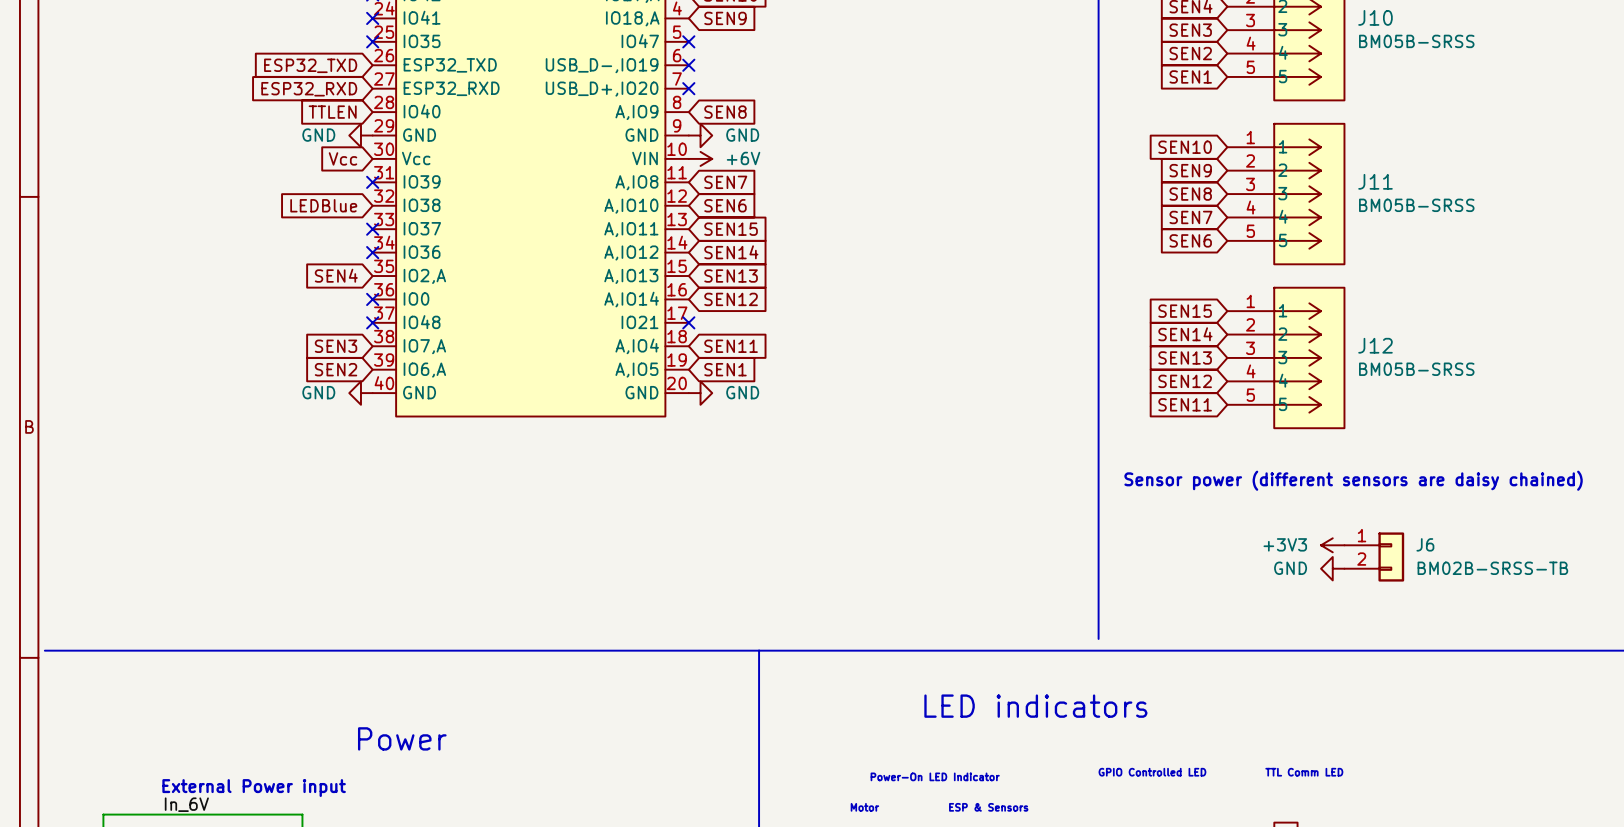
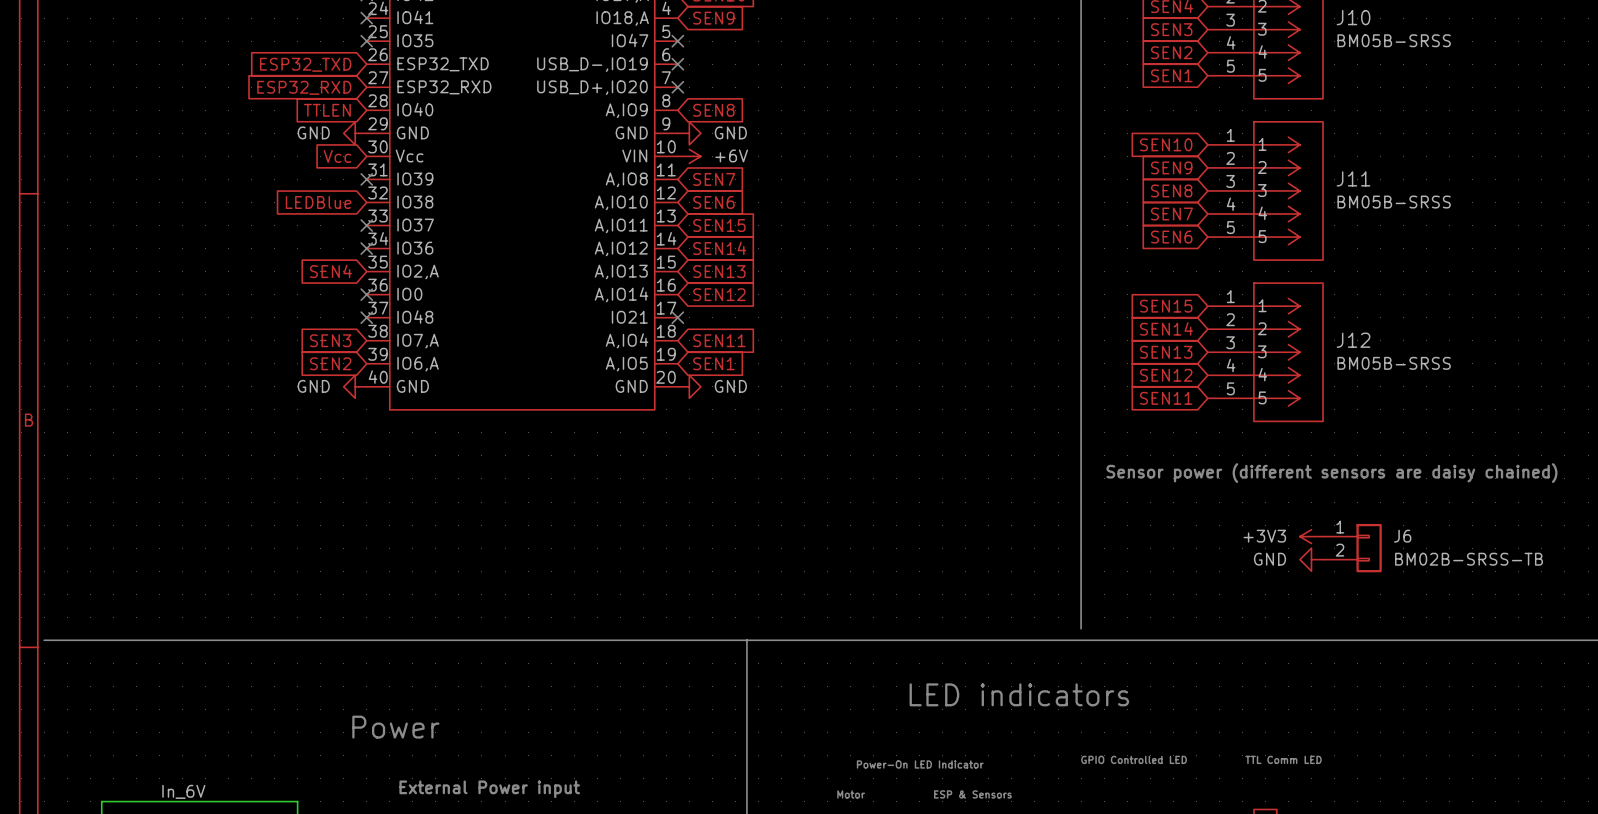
text: External Power input (254, 788) -> none
text: none -> External Power input (489, 789)

